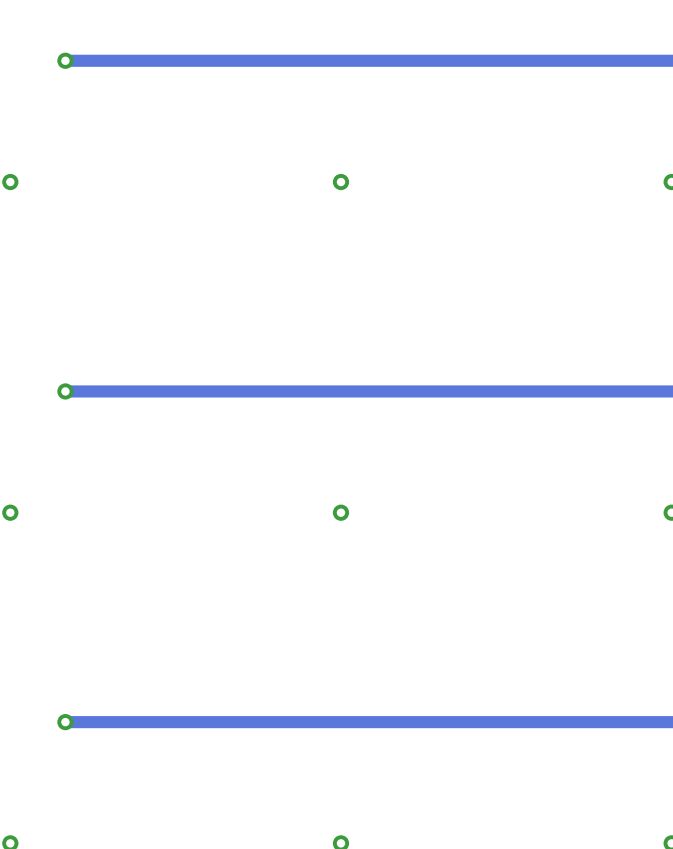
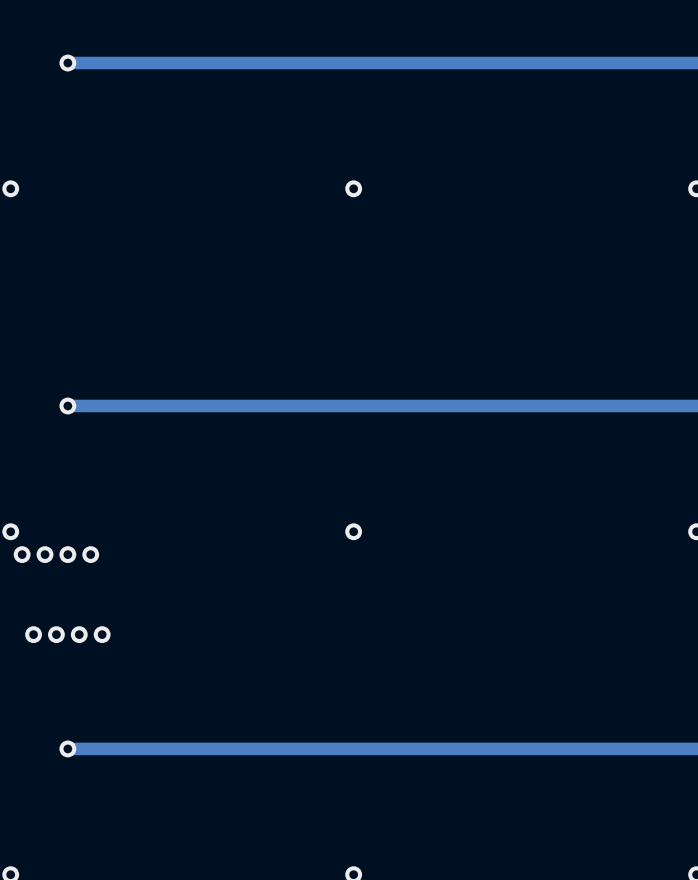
via: none -> (22, 554)
via: none -> (45, 554)
via: none -> (67, 554)
via: none -> (90, 554)
via: none -> (33, 634)
via: none -> (56, 634)
via: none -> (79, 634)
via: none -> (102, 634)

